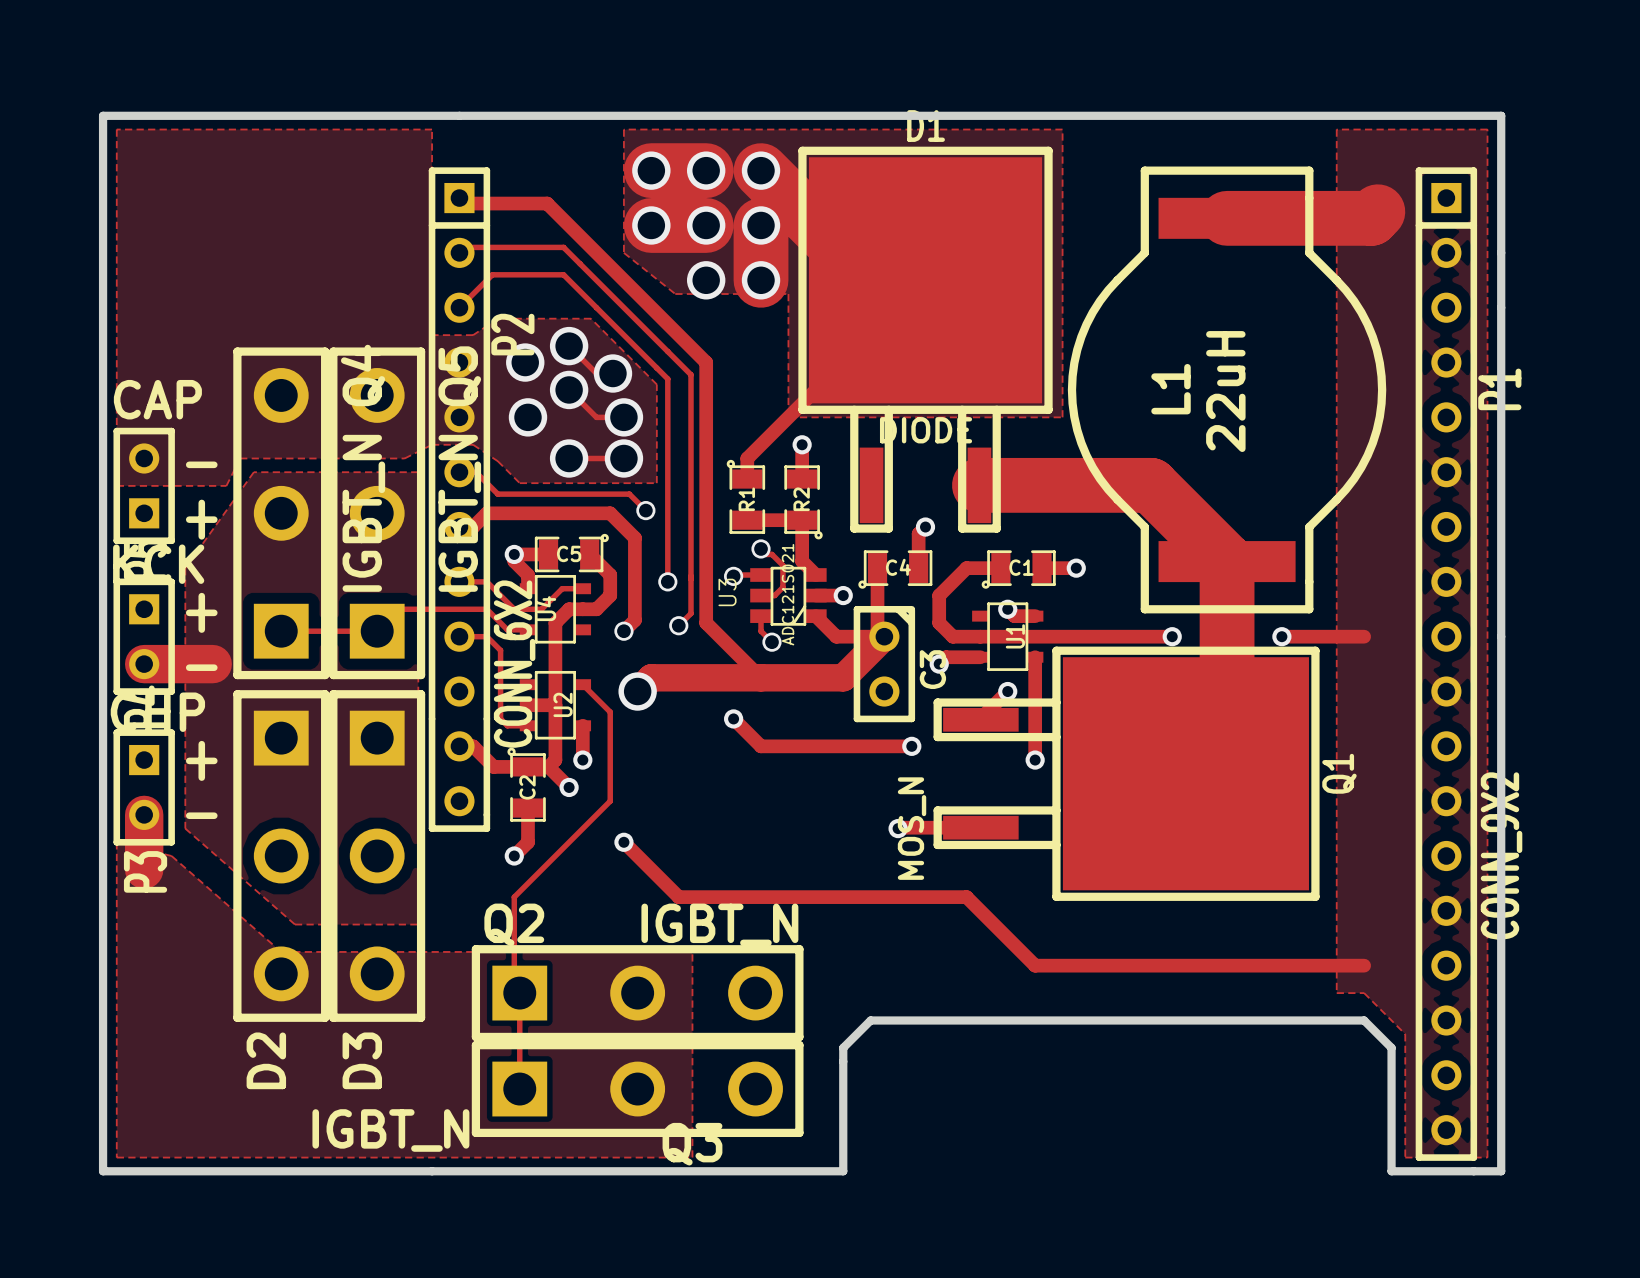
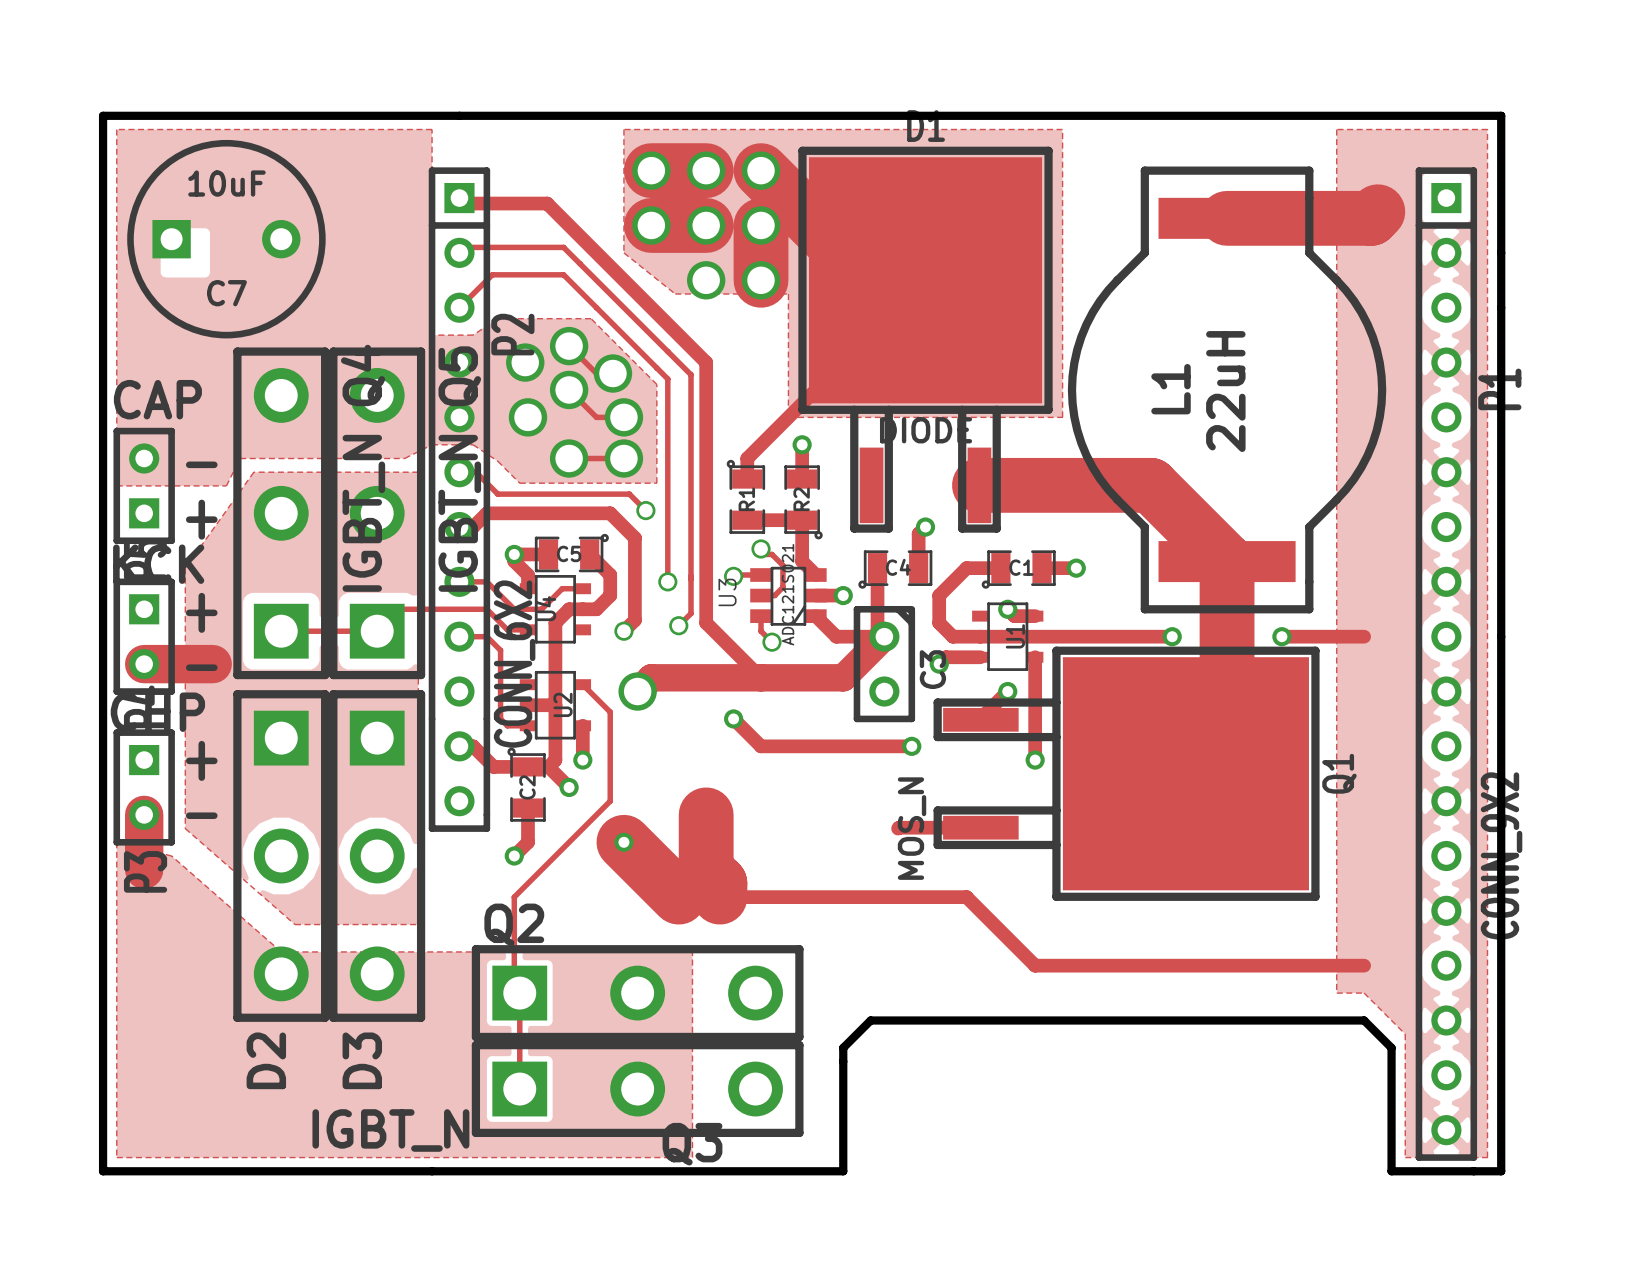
C7: none -> 10uF (226, 239)
track: none -> (706, 814) (706, 869) (719, 883) (719, 897)
via: (898, 828) -> none
track width: thin (623, 842) (678, 897) -> thick (623, 842) (678, 897)
Q2 value: IGBT_N (719, 924) -> none

